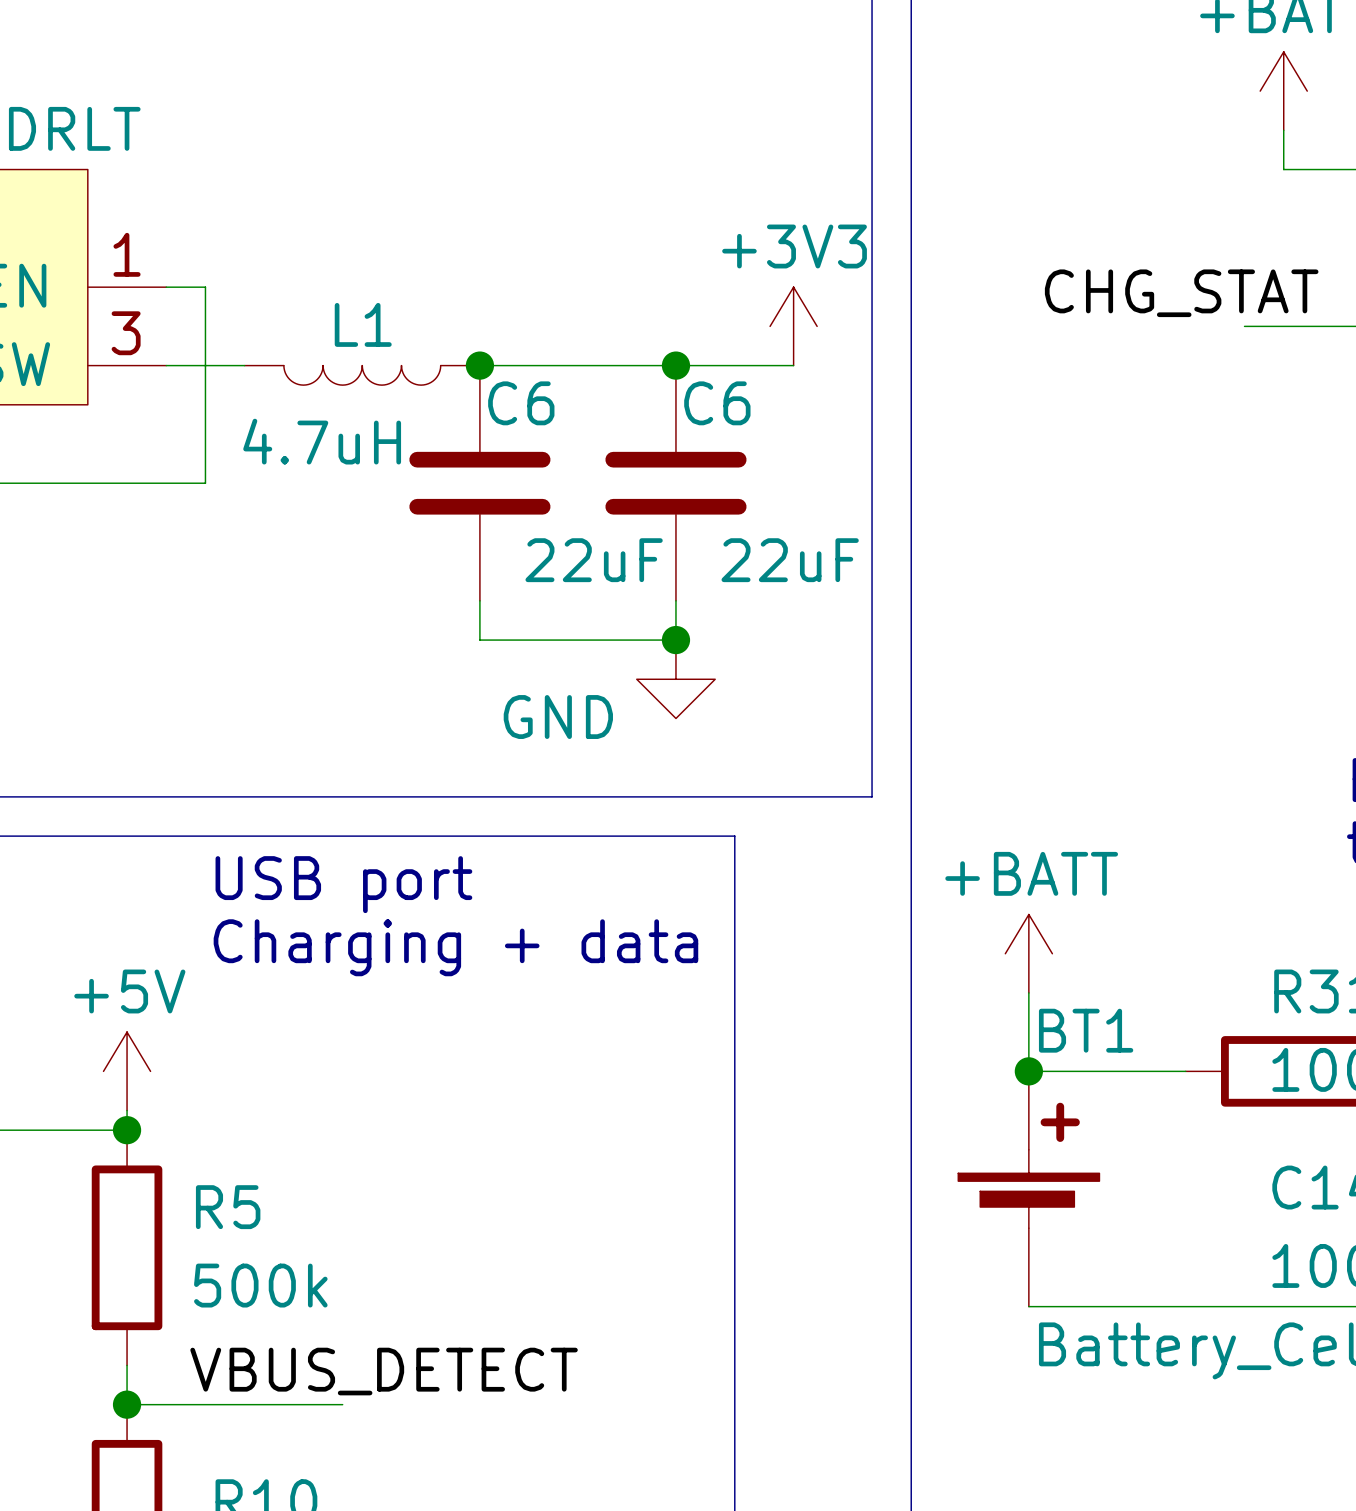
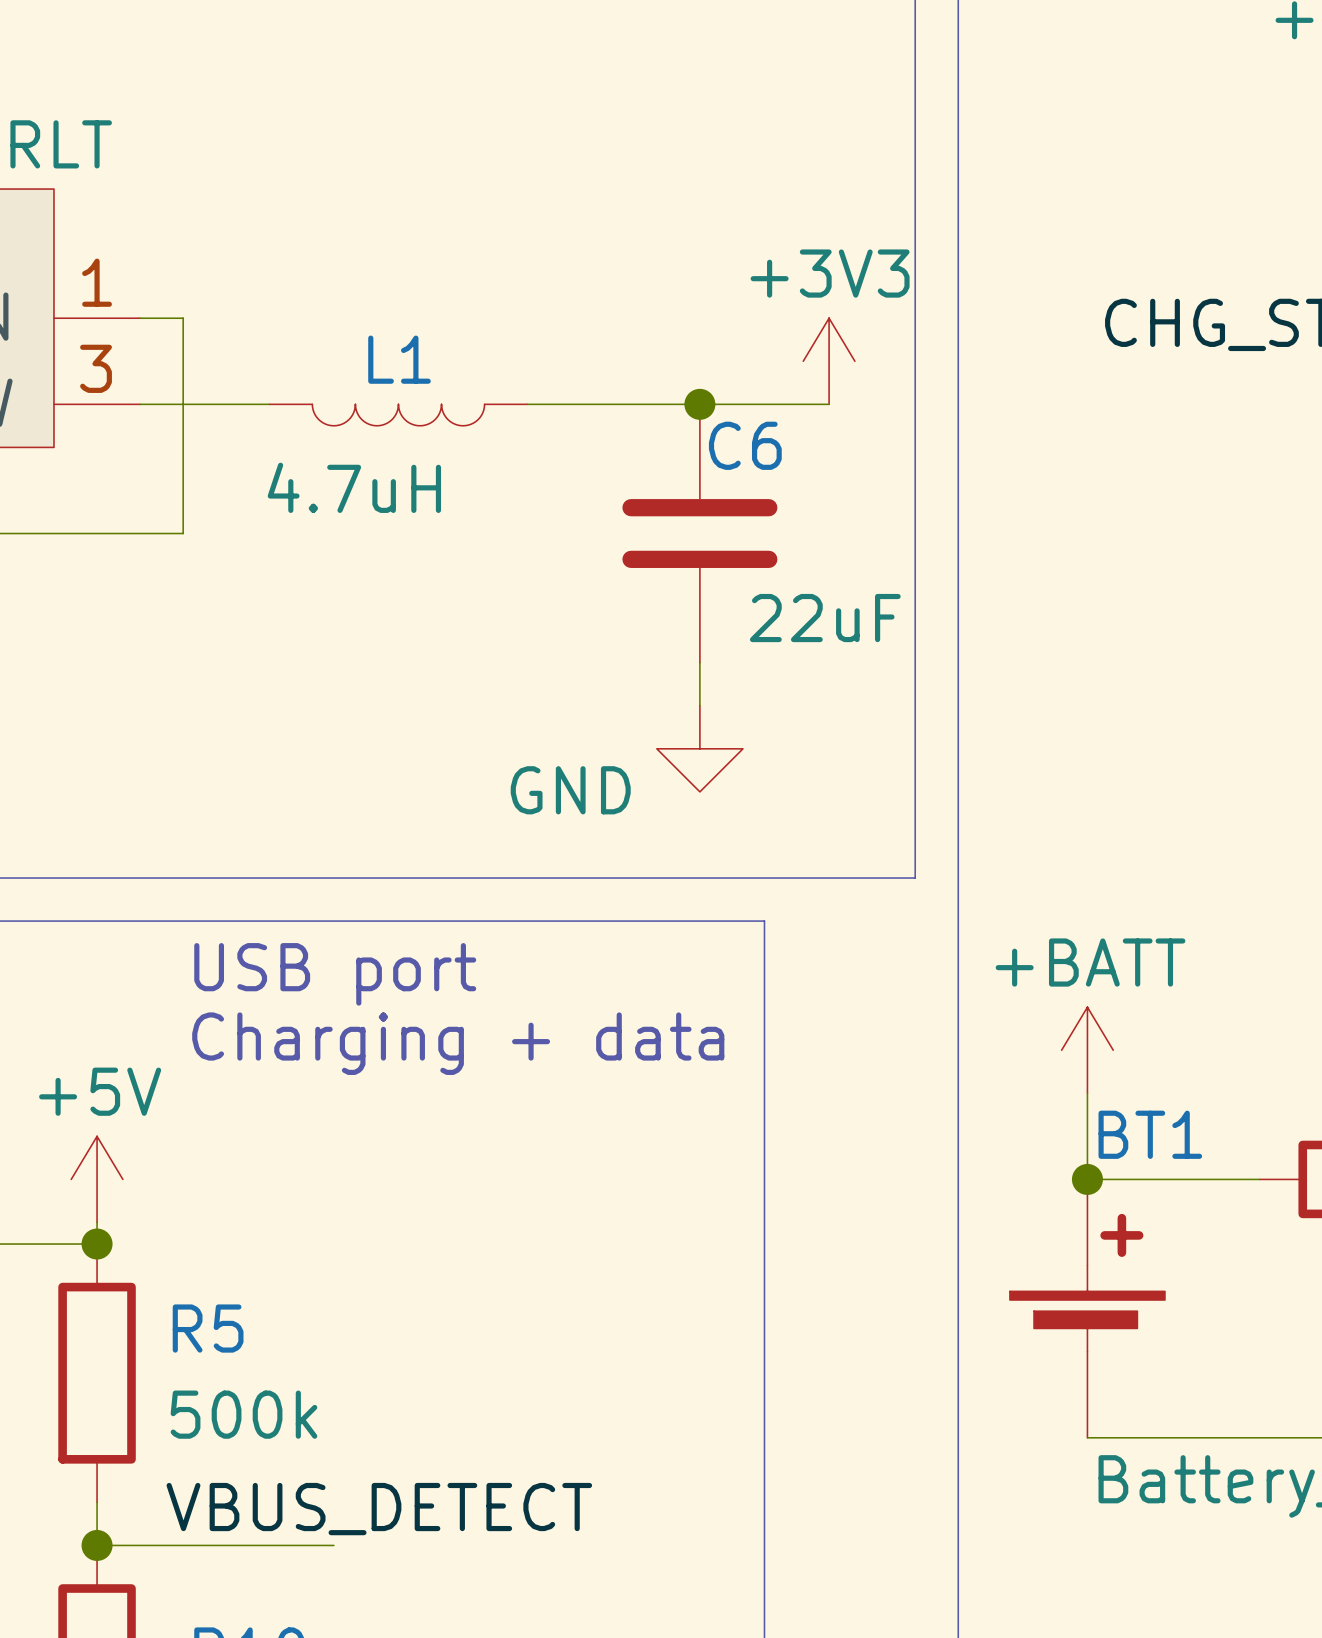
junction: (479, 365) -> none
L1 position: (362, 375) -> (398, 415)
C6: 22uF (479, 483) -> none
wire: (479, 600) (479, 640) (675, 640) -> none
junction: (675, 640) -> none

